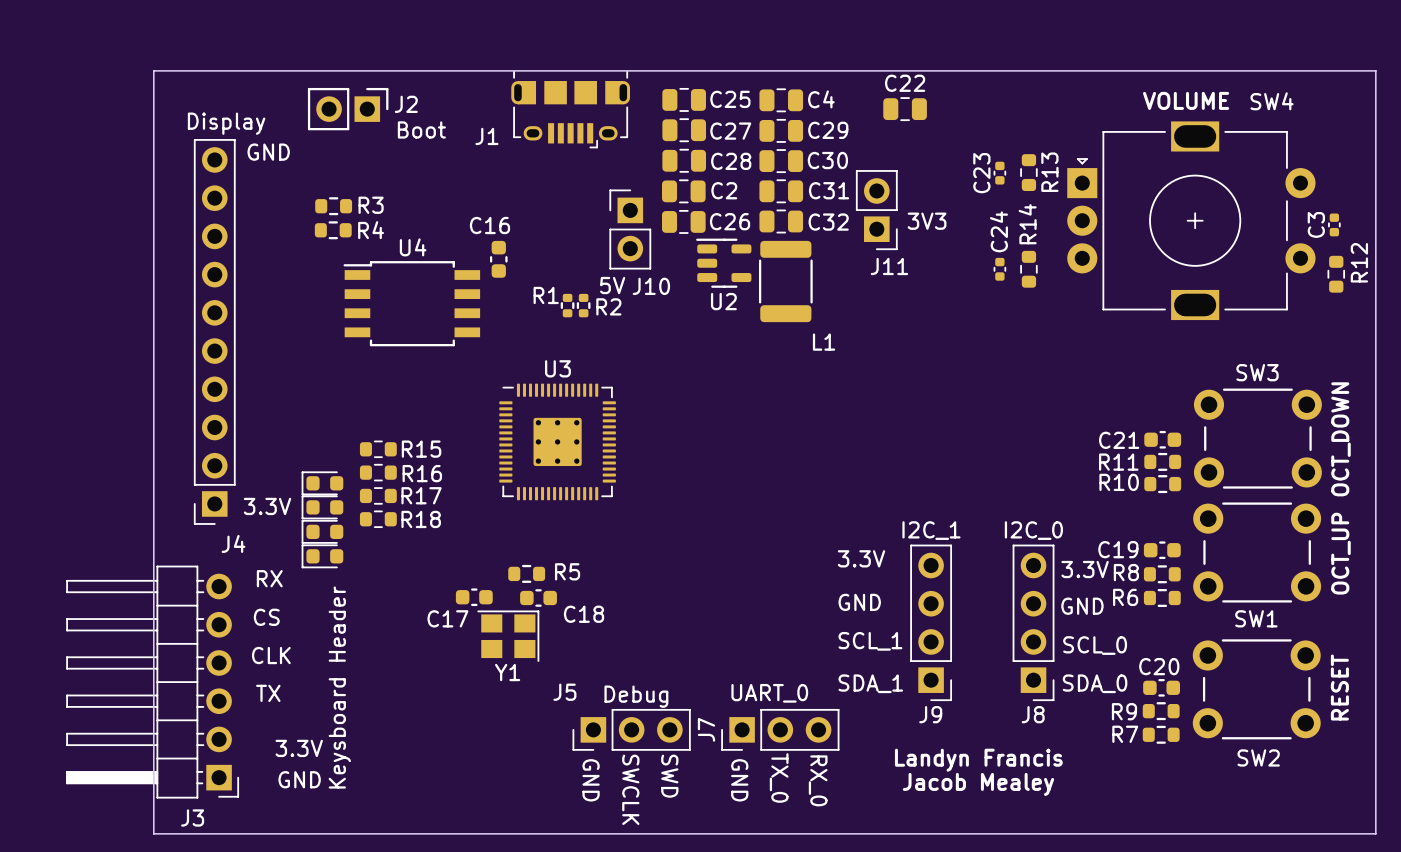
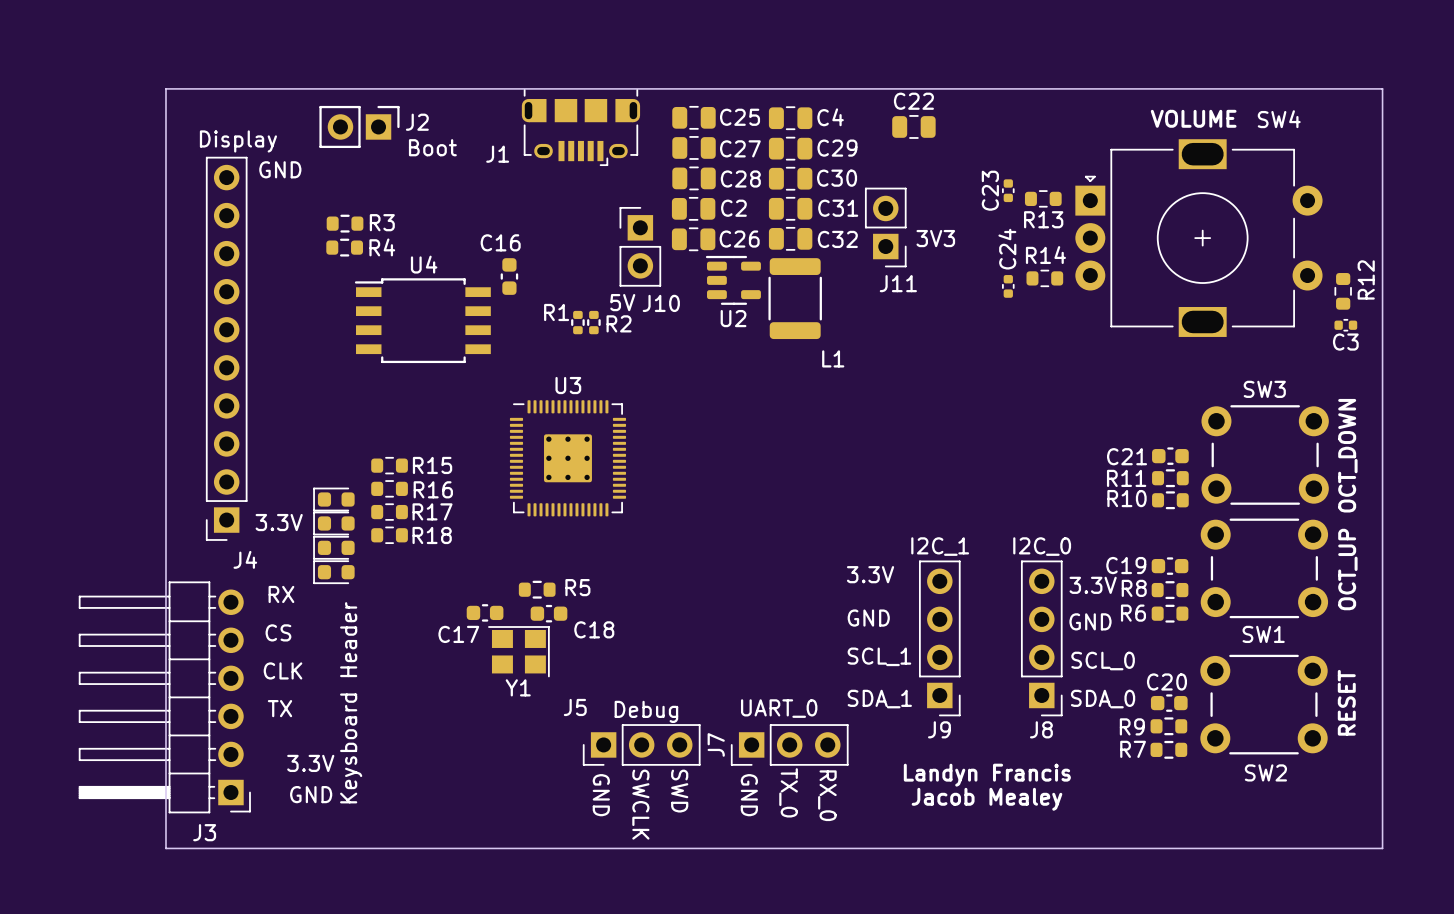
R13 rotation: 0° (1028, 172) -> 90° clockwise (1043, 198)
C3 rotation: 0° (1334, 224) -> 90° clockwise (1345, 325)
C3 position: (1334, 224) -> (1345, 325)
R14 rotation: 0° (1028, 269) -> 90° clockwise (1044, 278)

